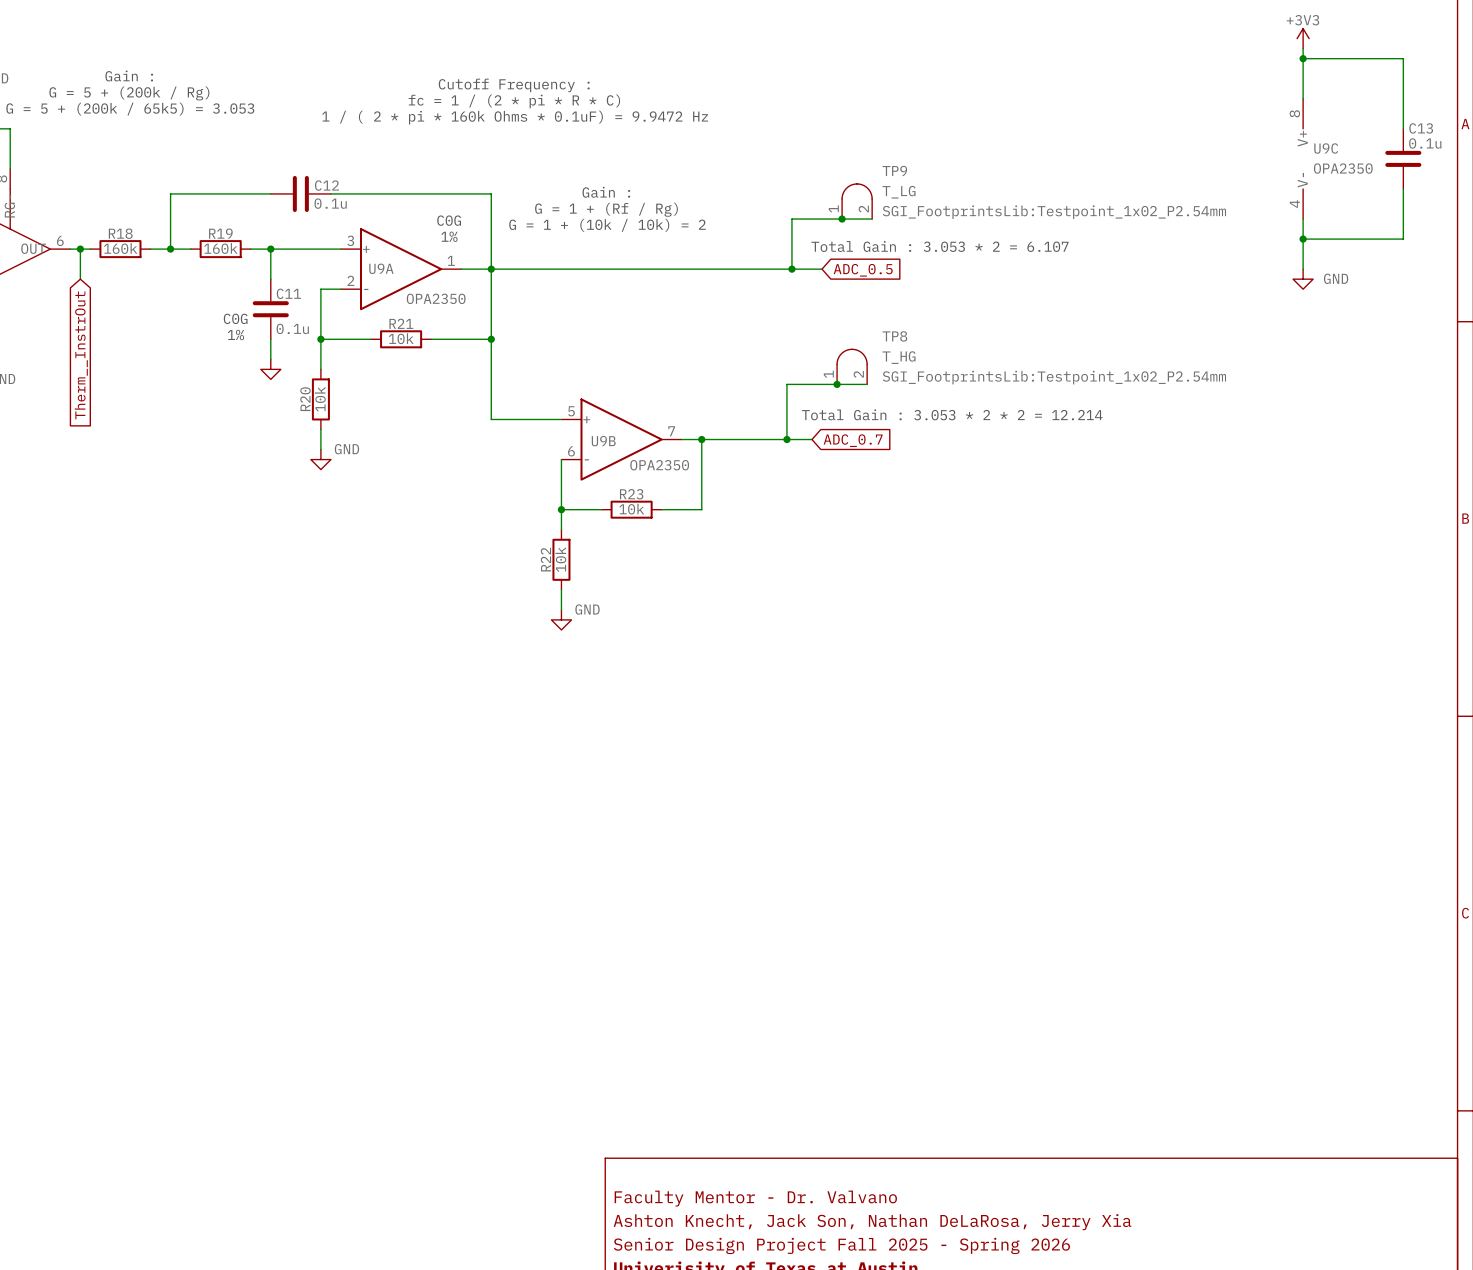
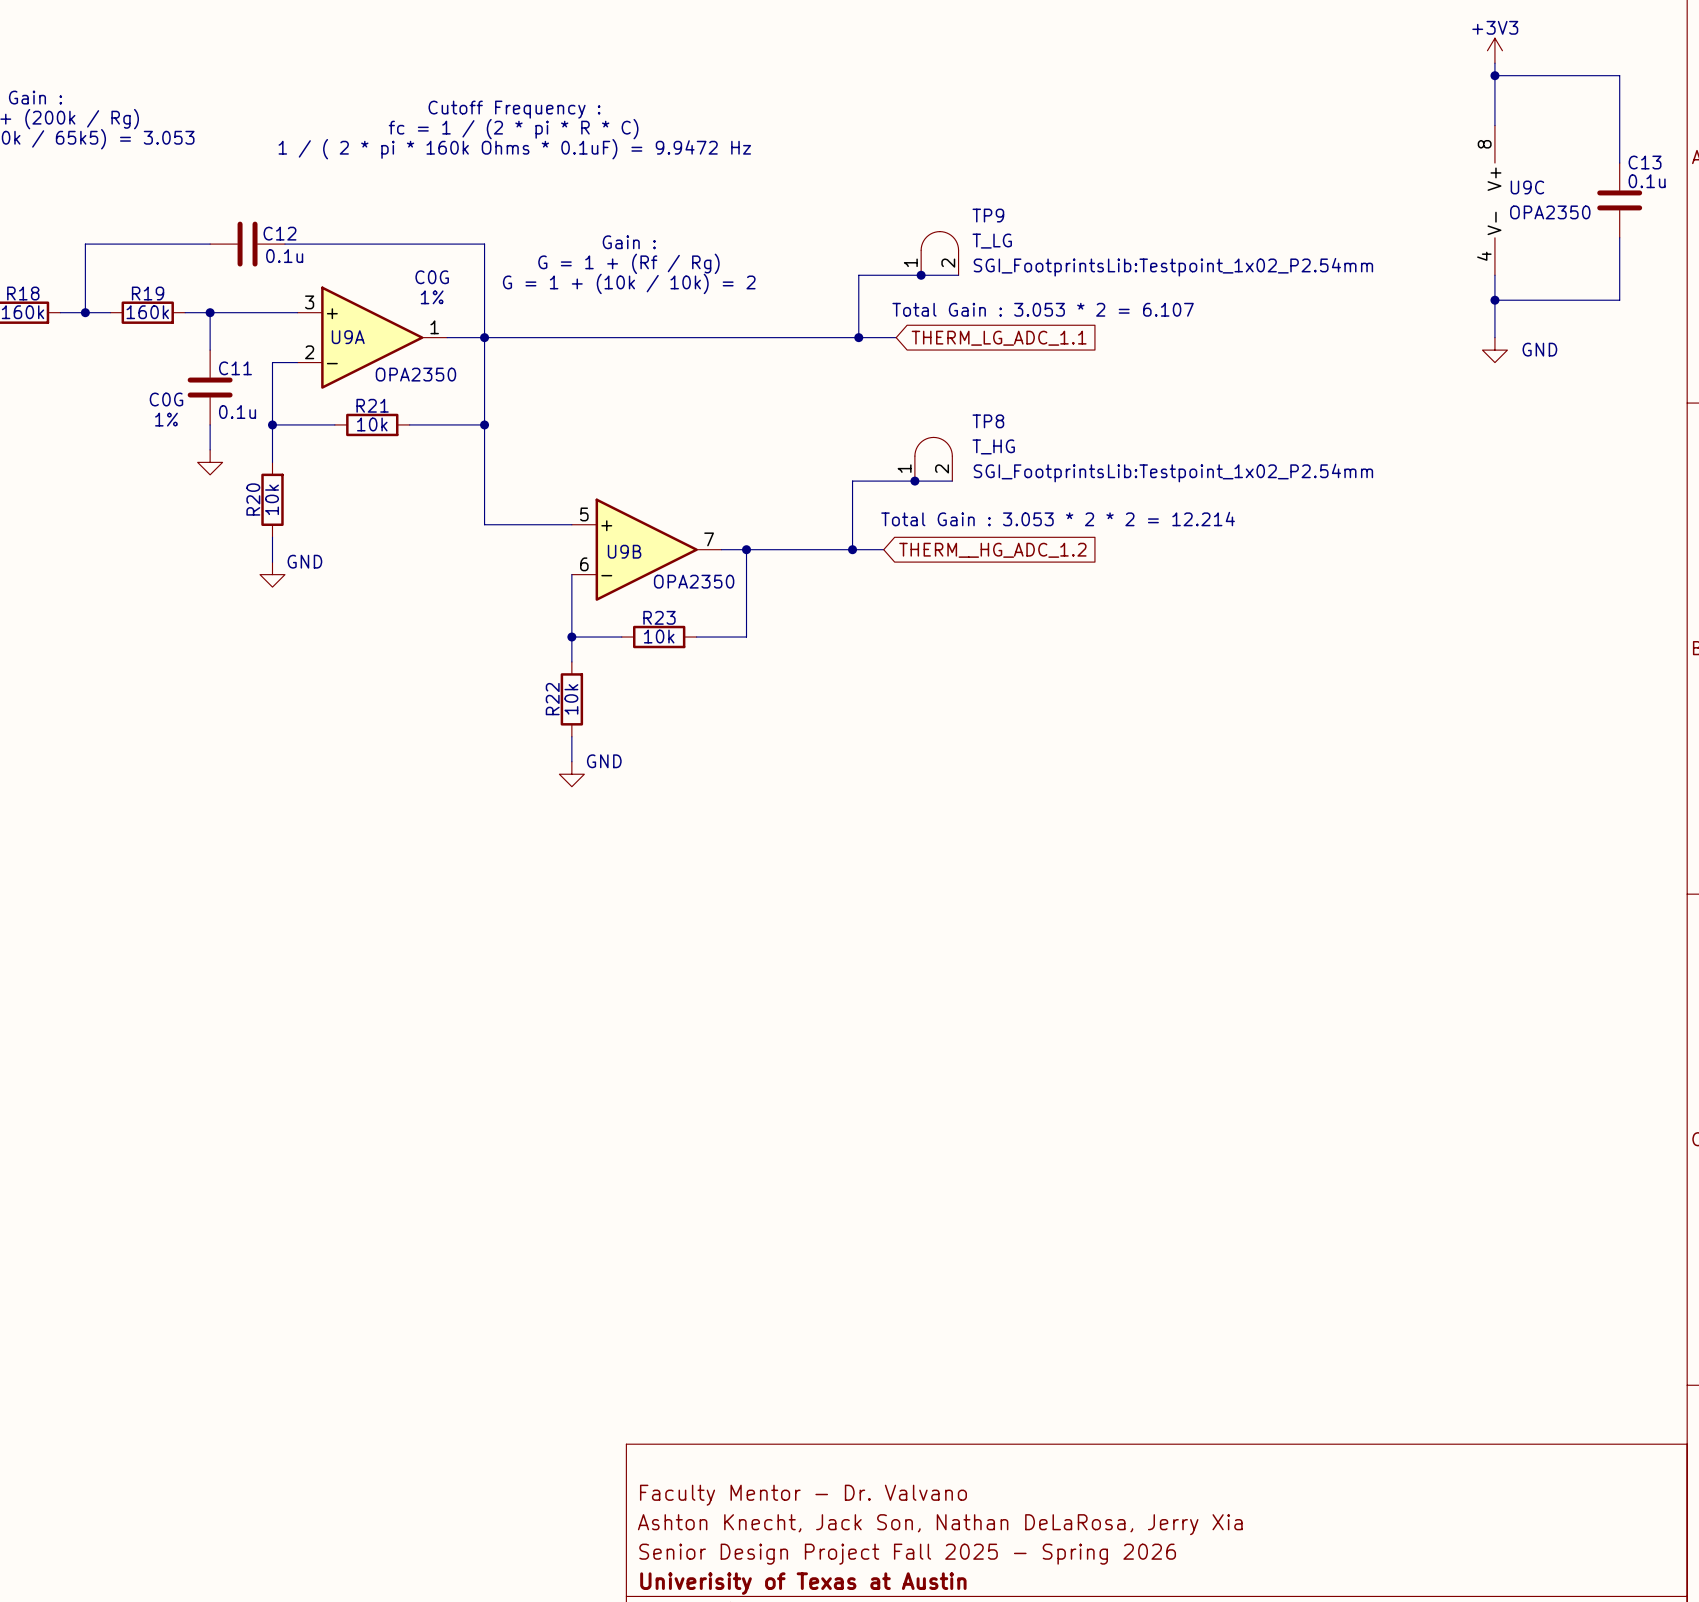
global label: ADC_0.5 (863, 270) -> THERM_LG_ADC_1.1 (999, 338)
global label: ADC_0.7 (853, 440) -> THERM__HG_ADC_1.2 (992, 550)

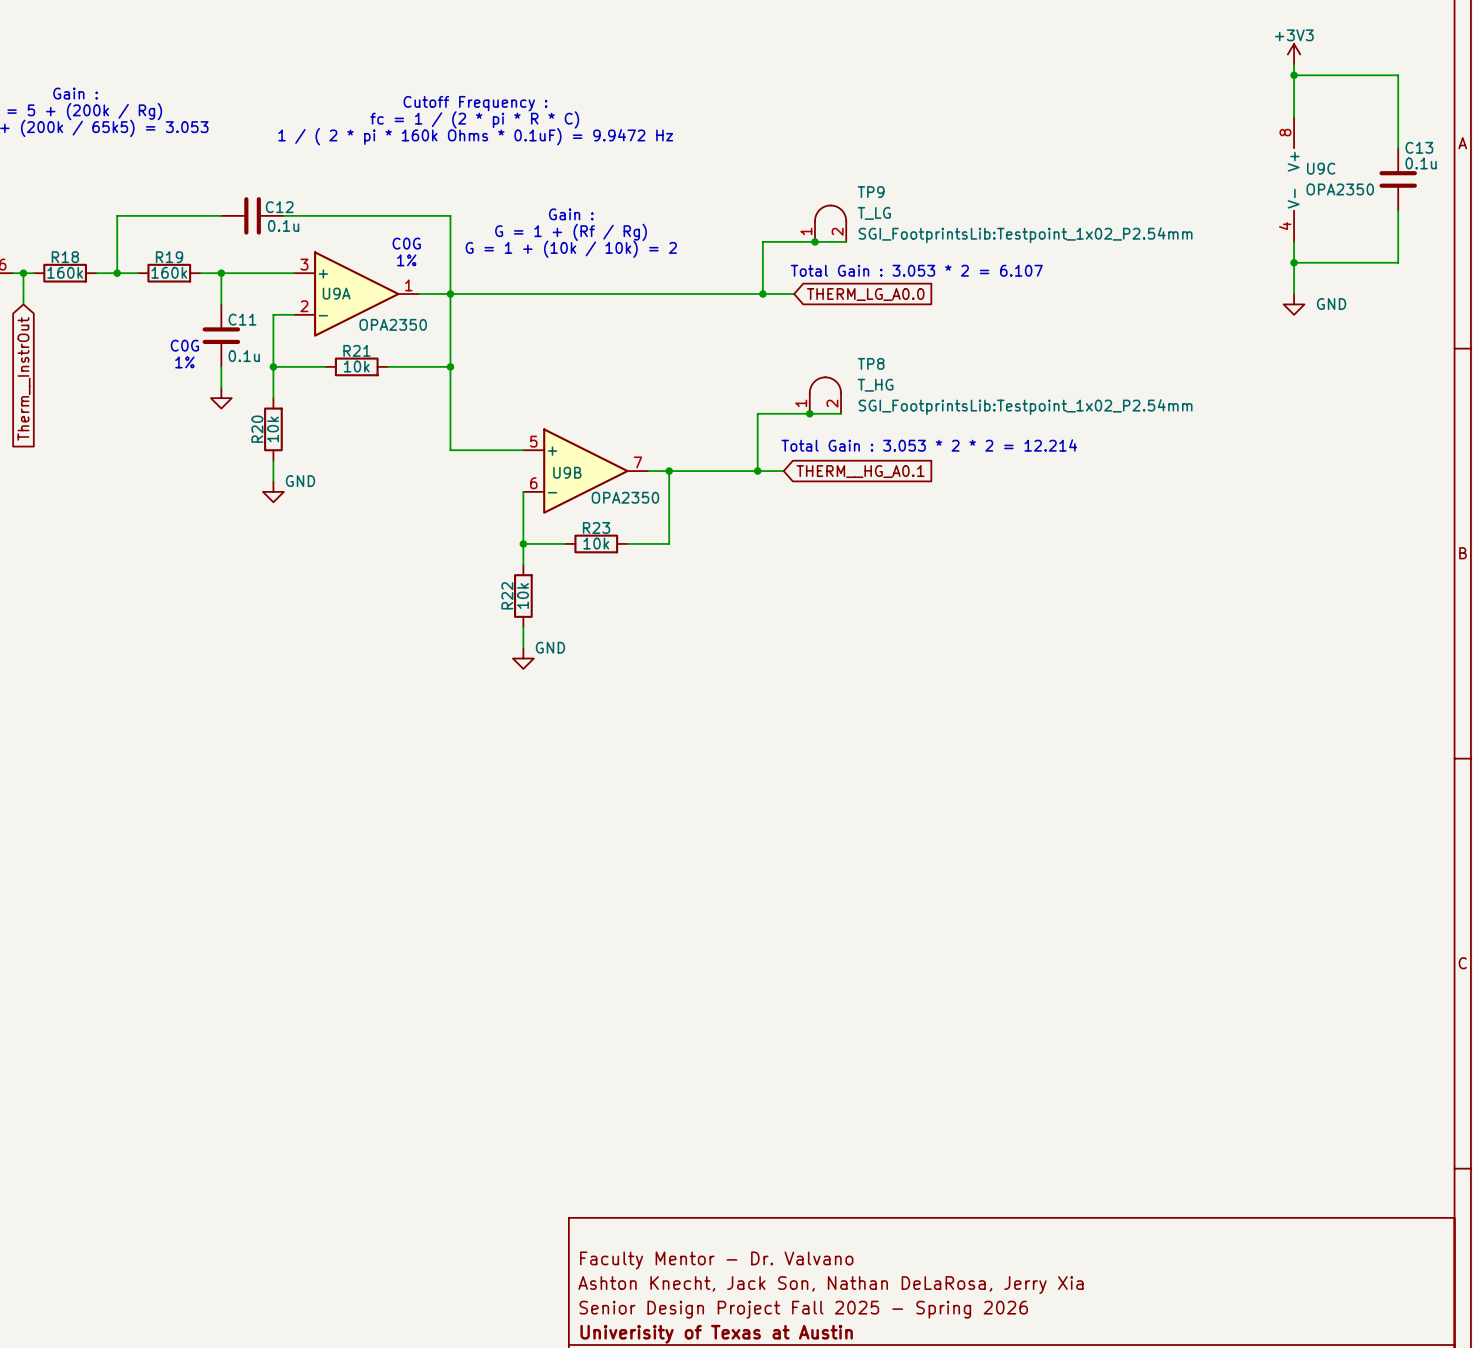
global label: THERM_LG_ADC_1.1 (999, 338) -> THERM_LG_A0.0 (865, 294)
global label: THERM__HG_ADC_1.2 (992, 550) -> THERM__HG_A0.1 (860, 471)

